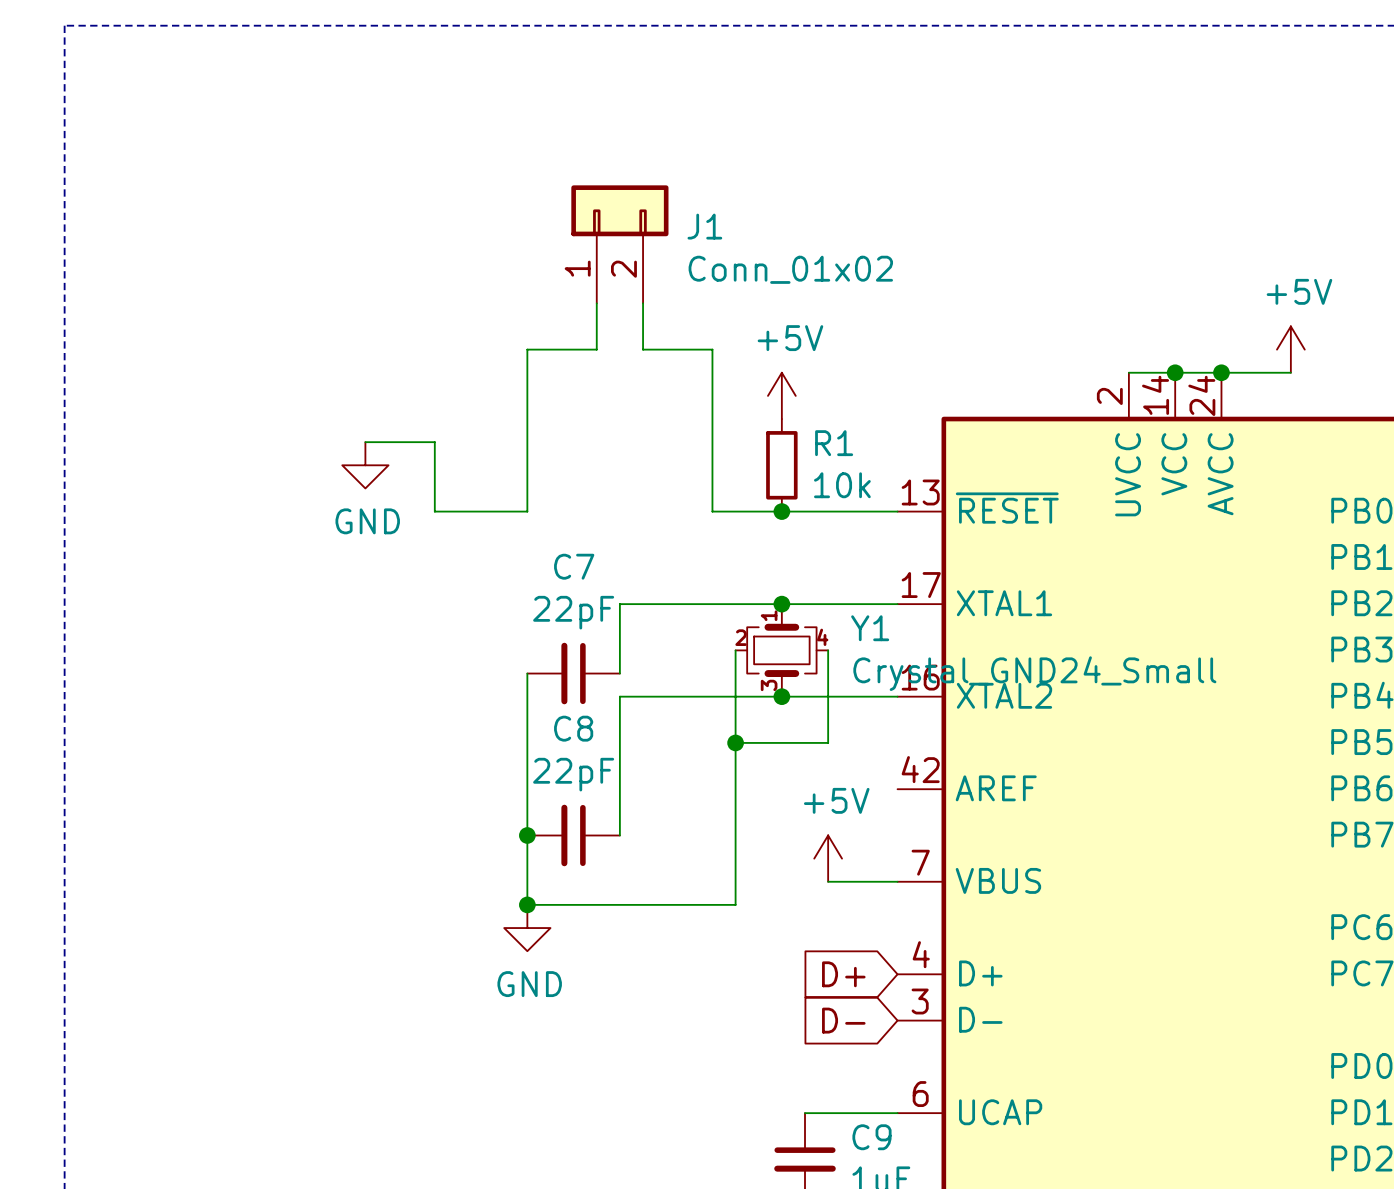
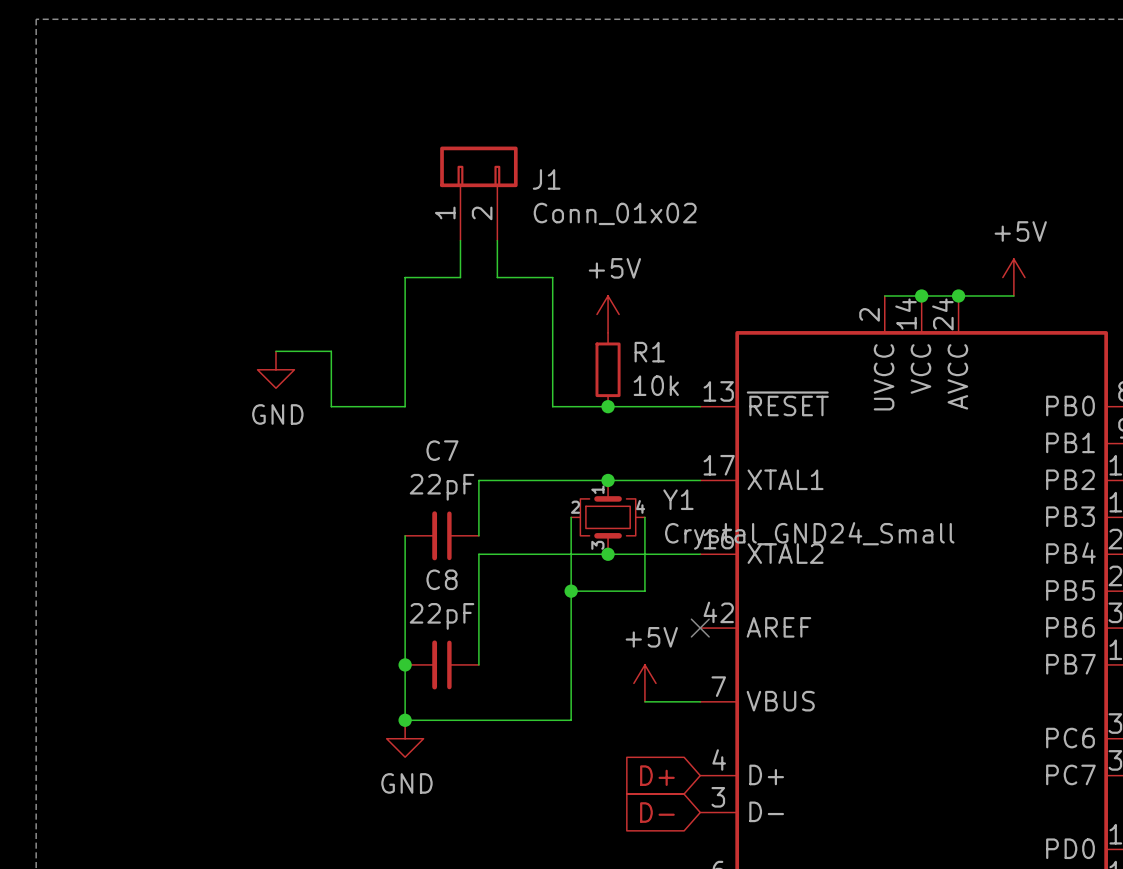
no-connect mark: none -> (700, 628)

